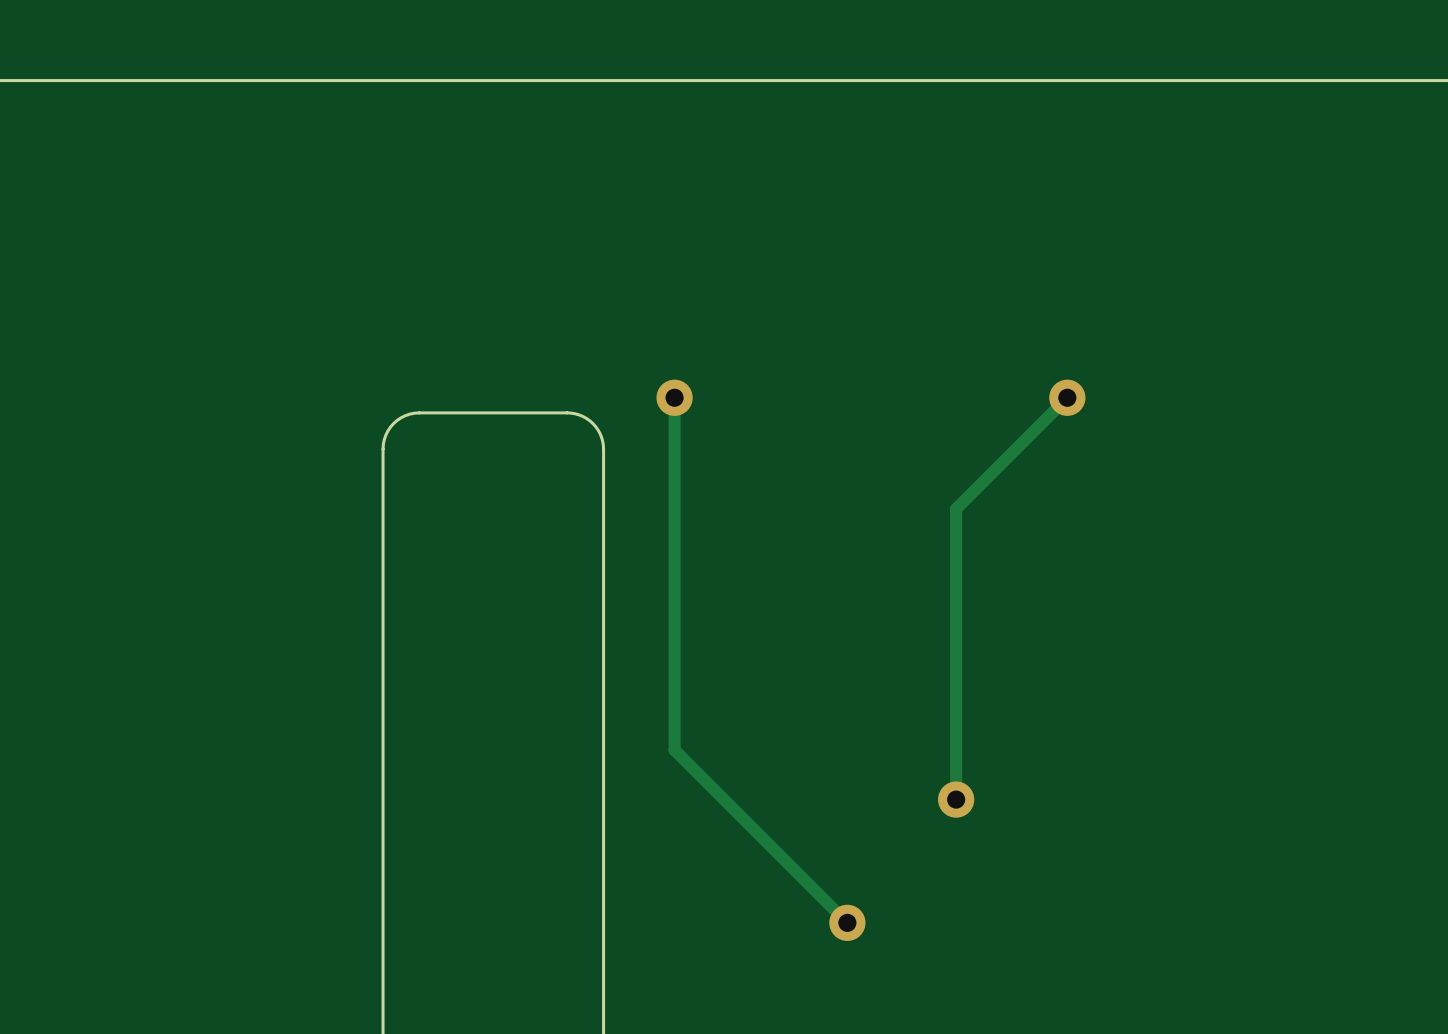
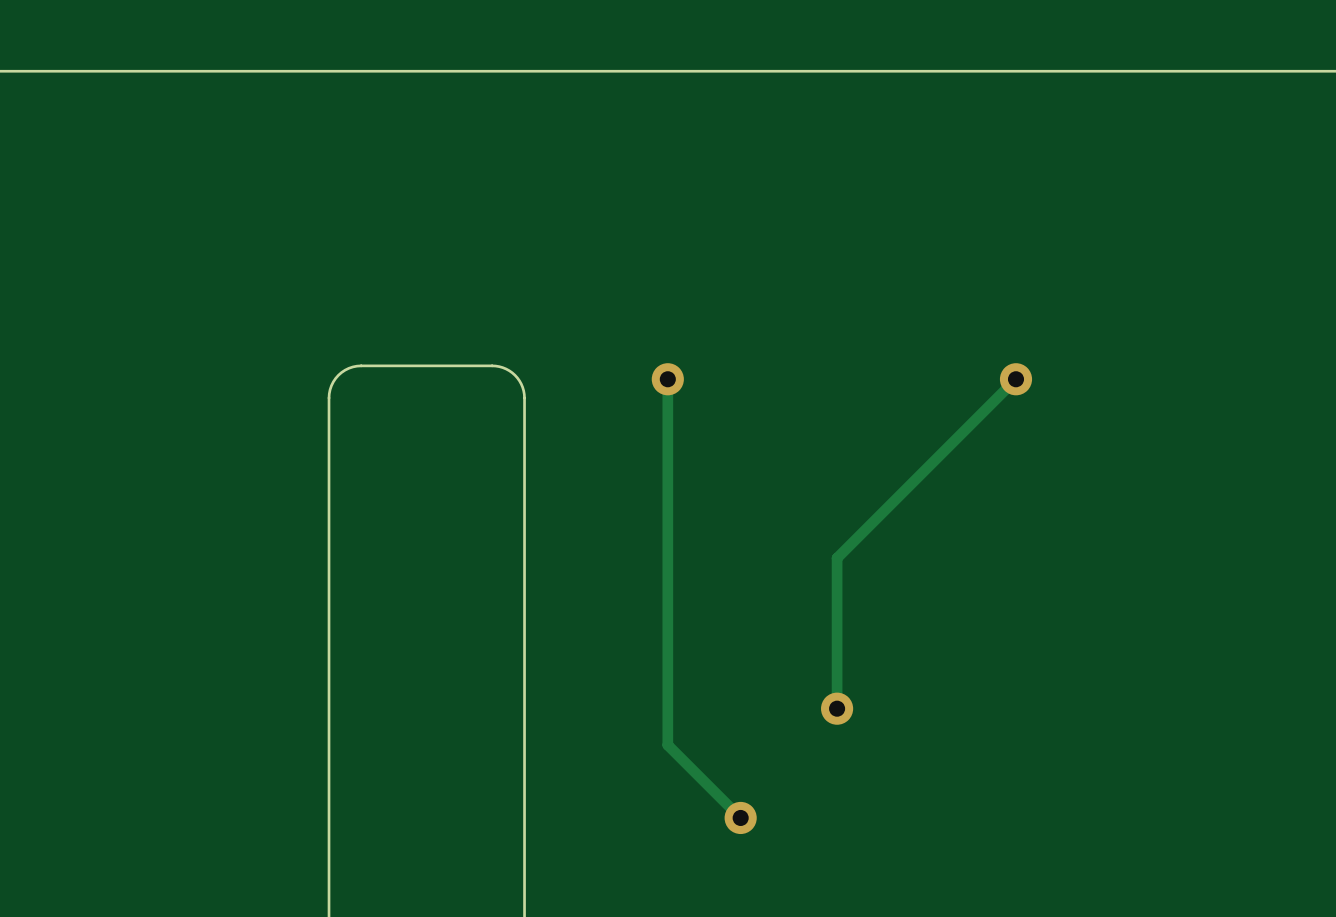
track: (674, 397) (674, 750) (765, 840) -> (667, 379) (667, 745)
via position: (674, 397) -> (667, 379)
track: (1067, 397) (956, 508) (956, 629) -> (1016, 379) (837, 558)
via position: (1067, 397) -> (1016, 379)

